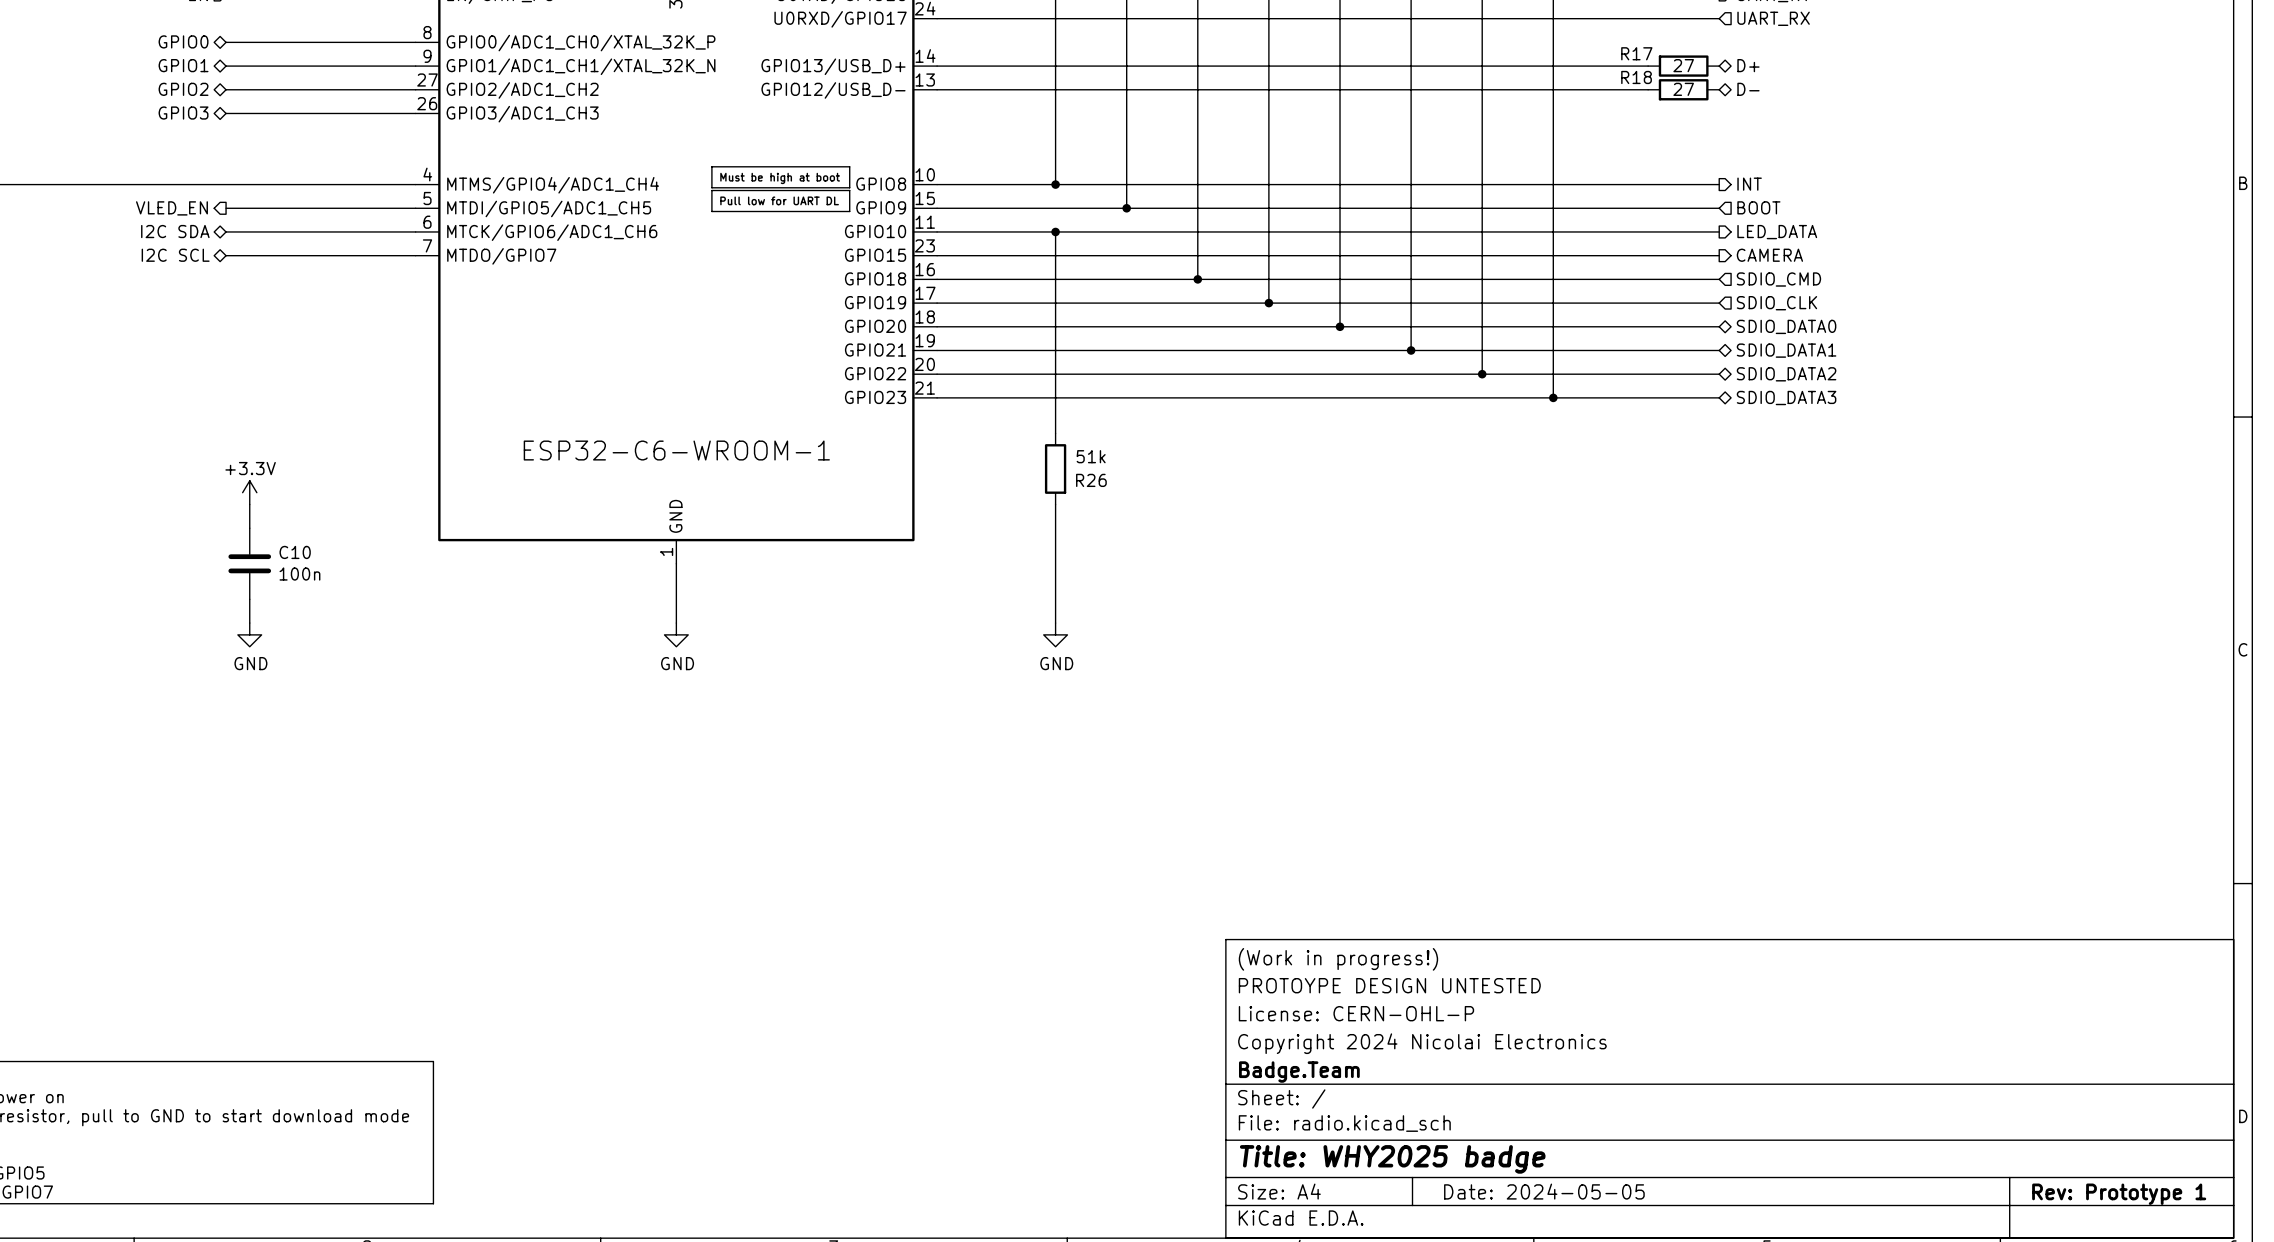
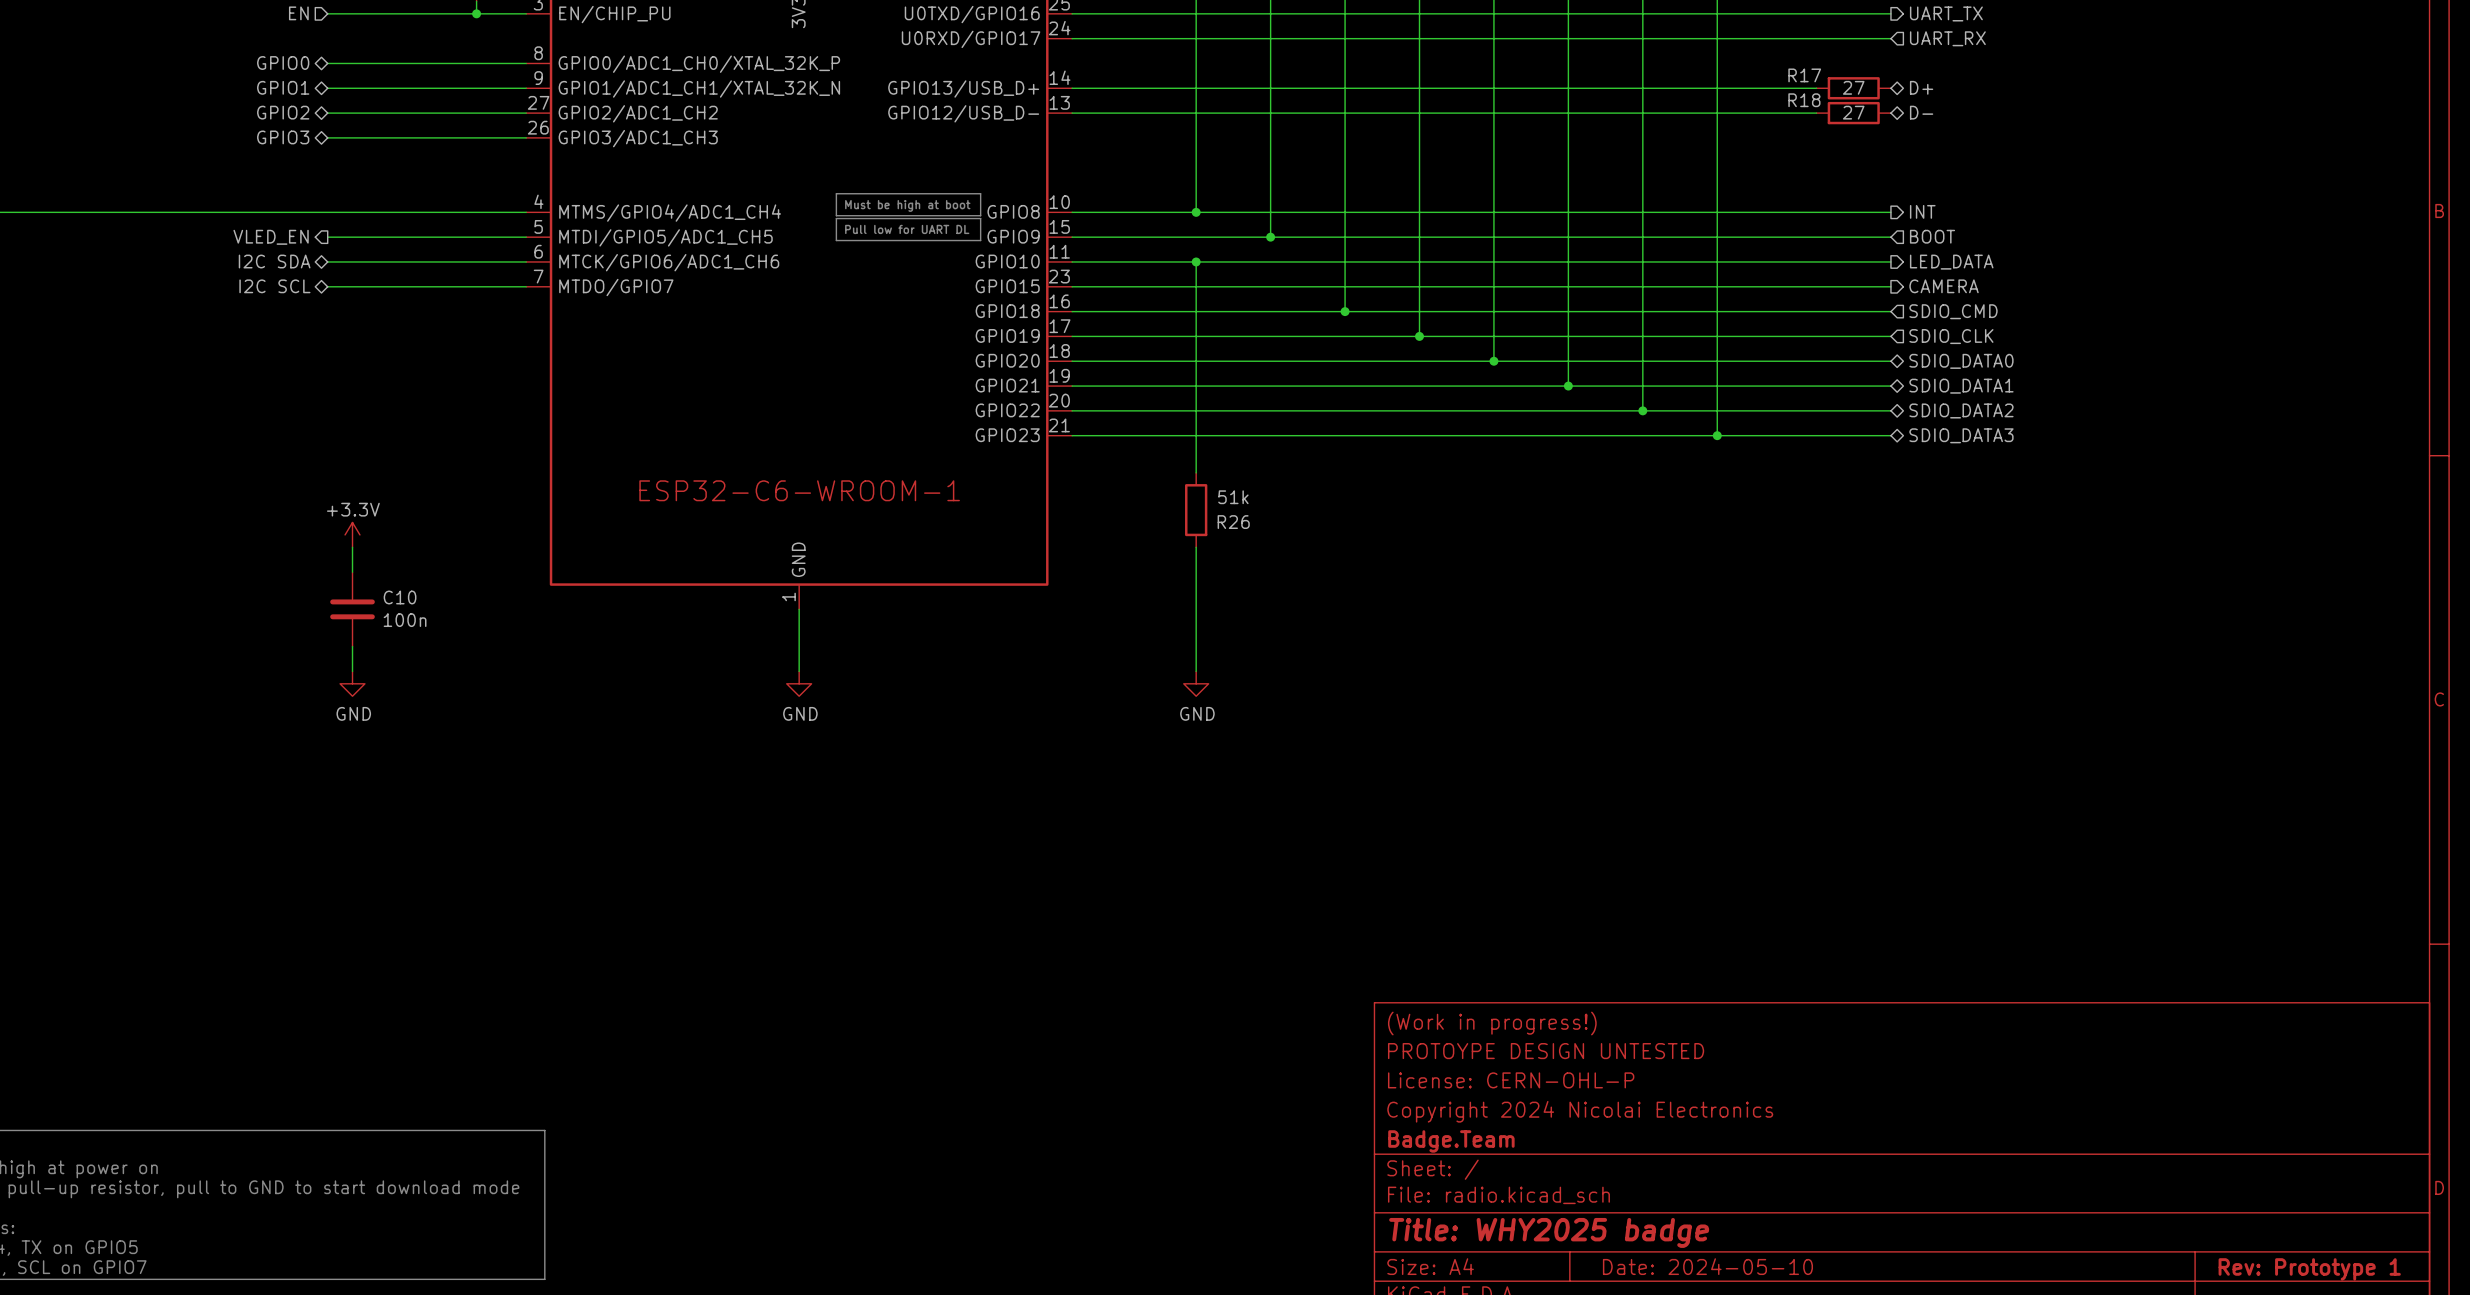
title block: Date: 2024-05-05 (1544, 1191) -> Date: 2024-05-10 (1707, 1266)

